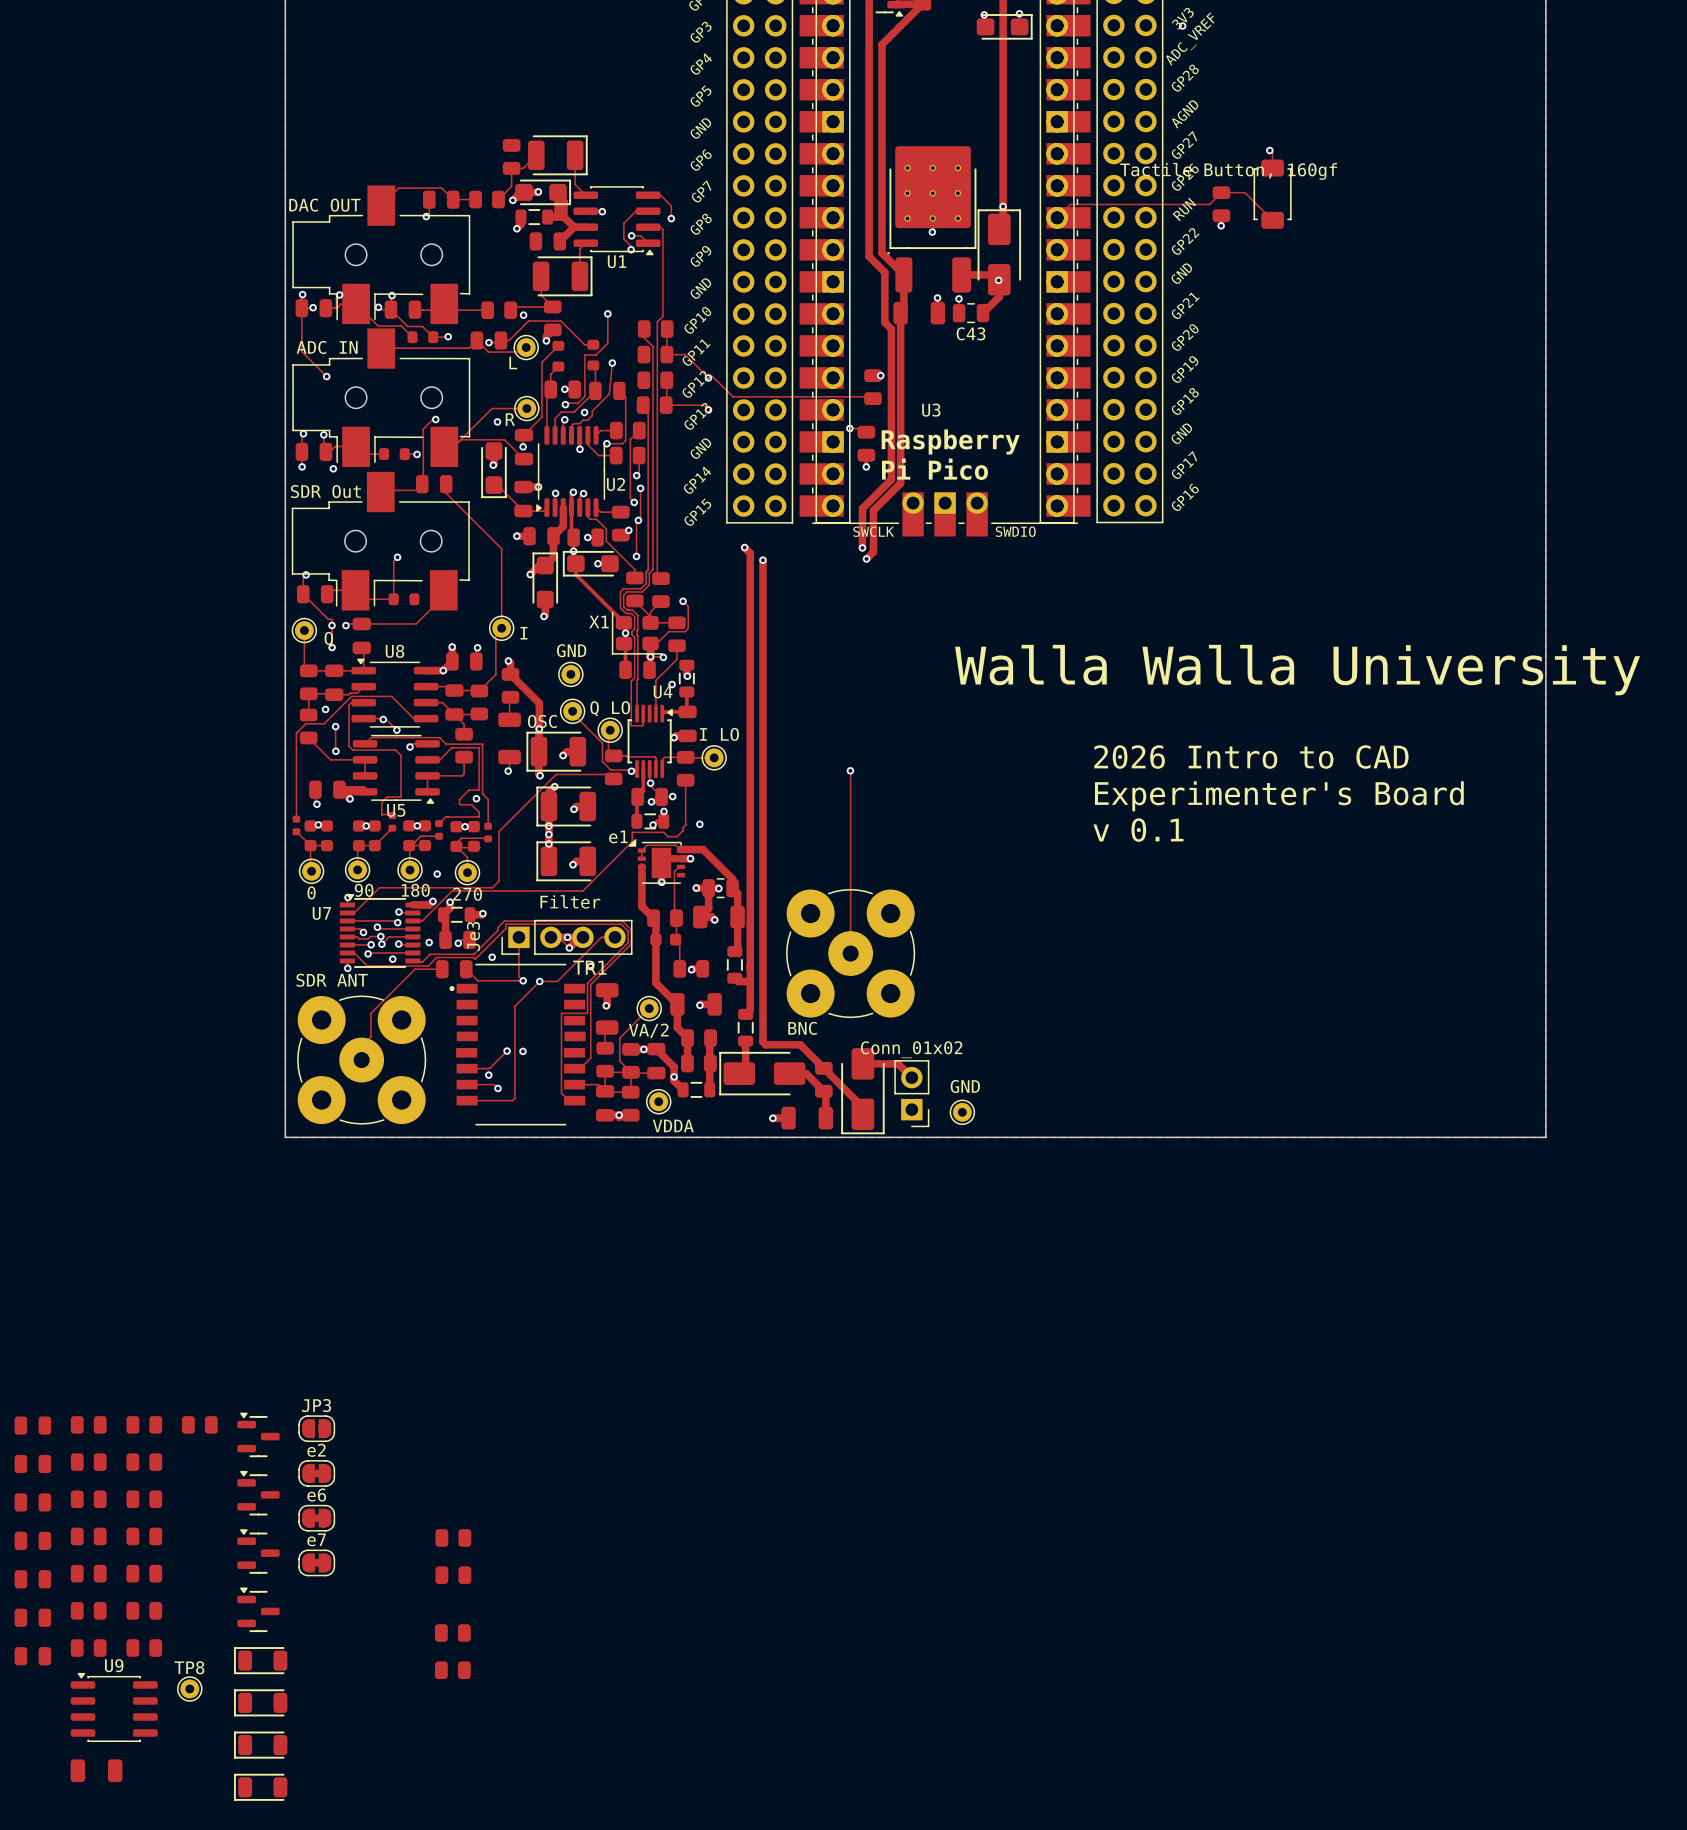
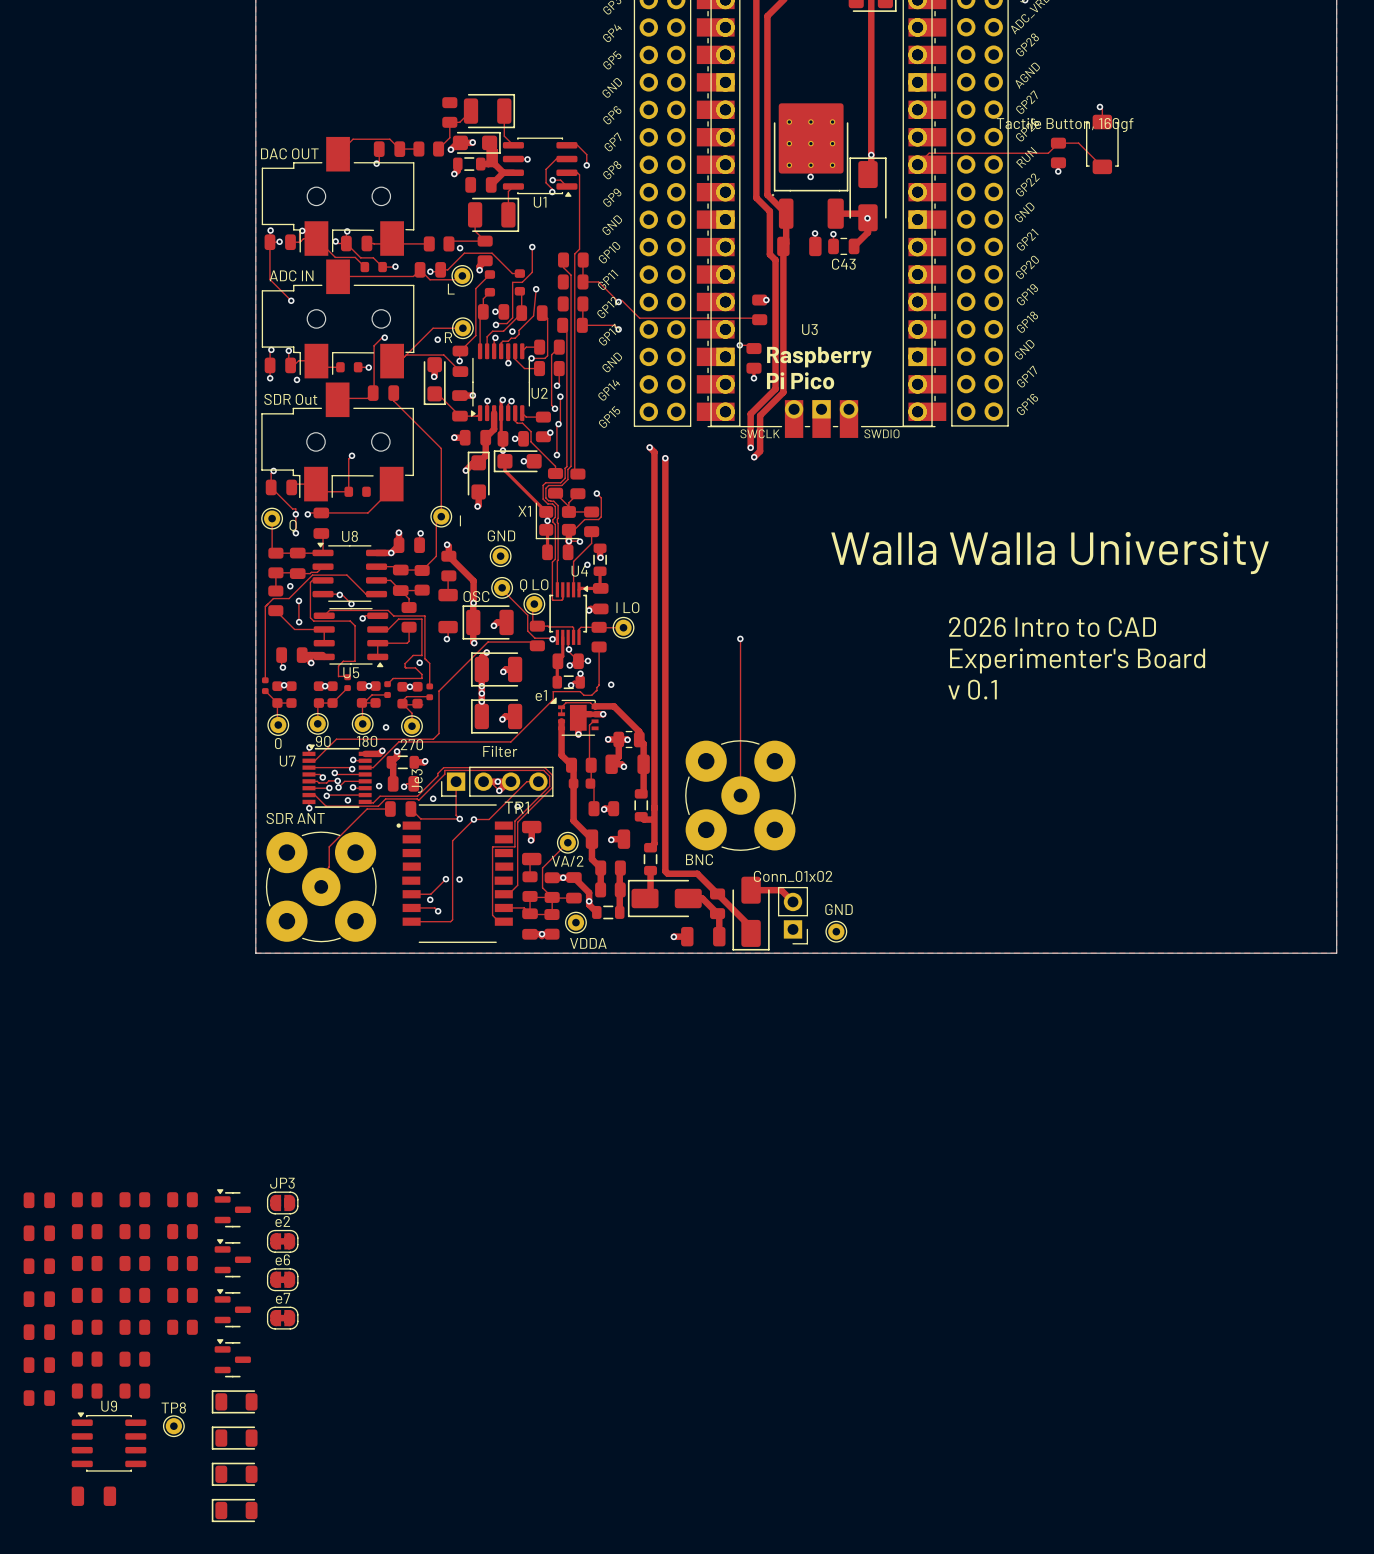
part: none -> (182, 1231)
part: none -> (182, 1263)
part: none -> (182, 1295)
part: (453, 1537) -> none
part: none -> (182, 1327)
part: (453, 1575) -> none
part: (452, 1633) -> none
part: (452, 1670) -> none

